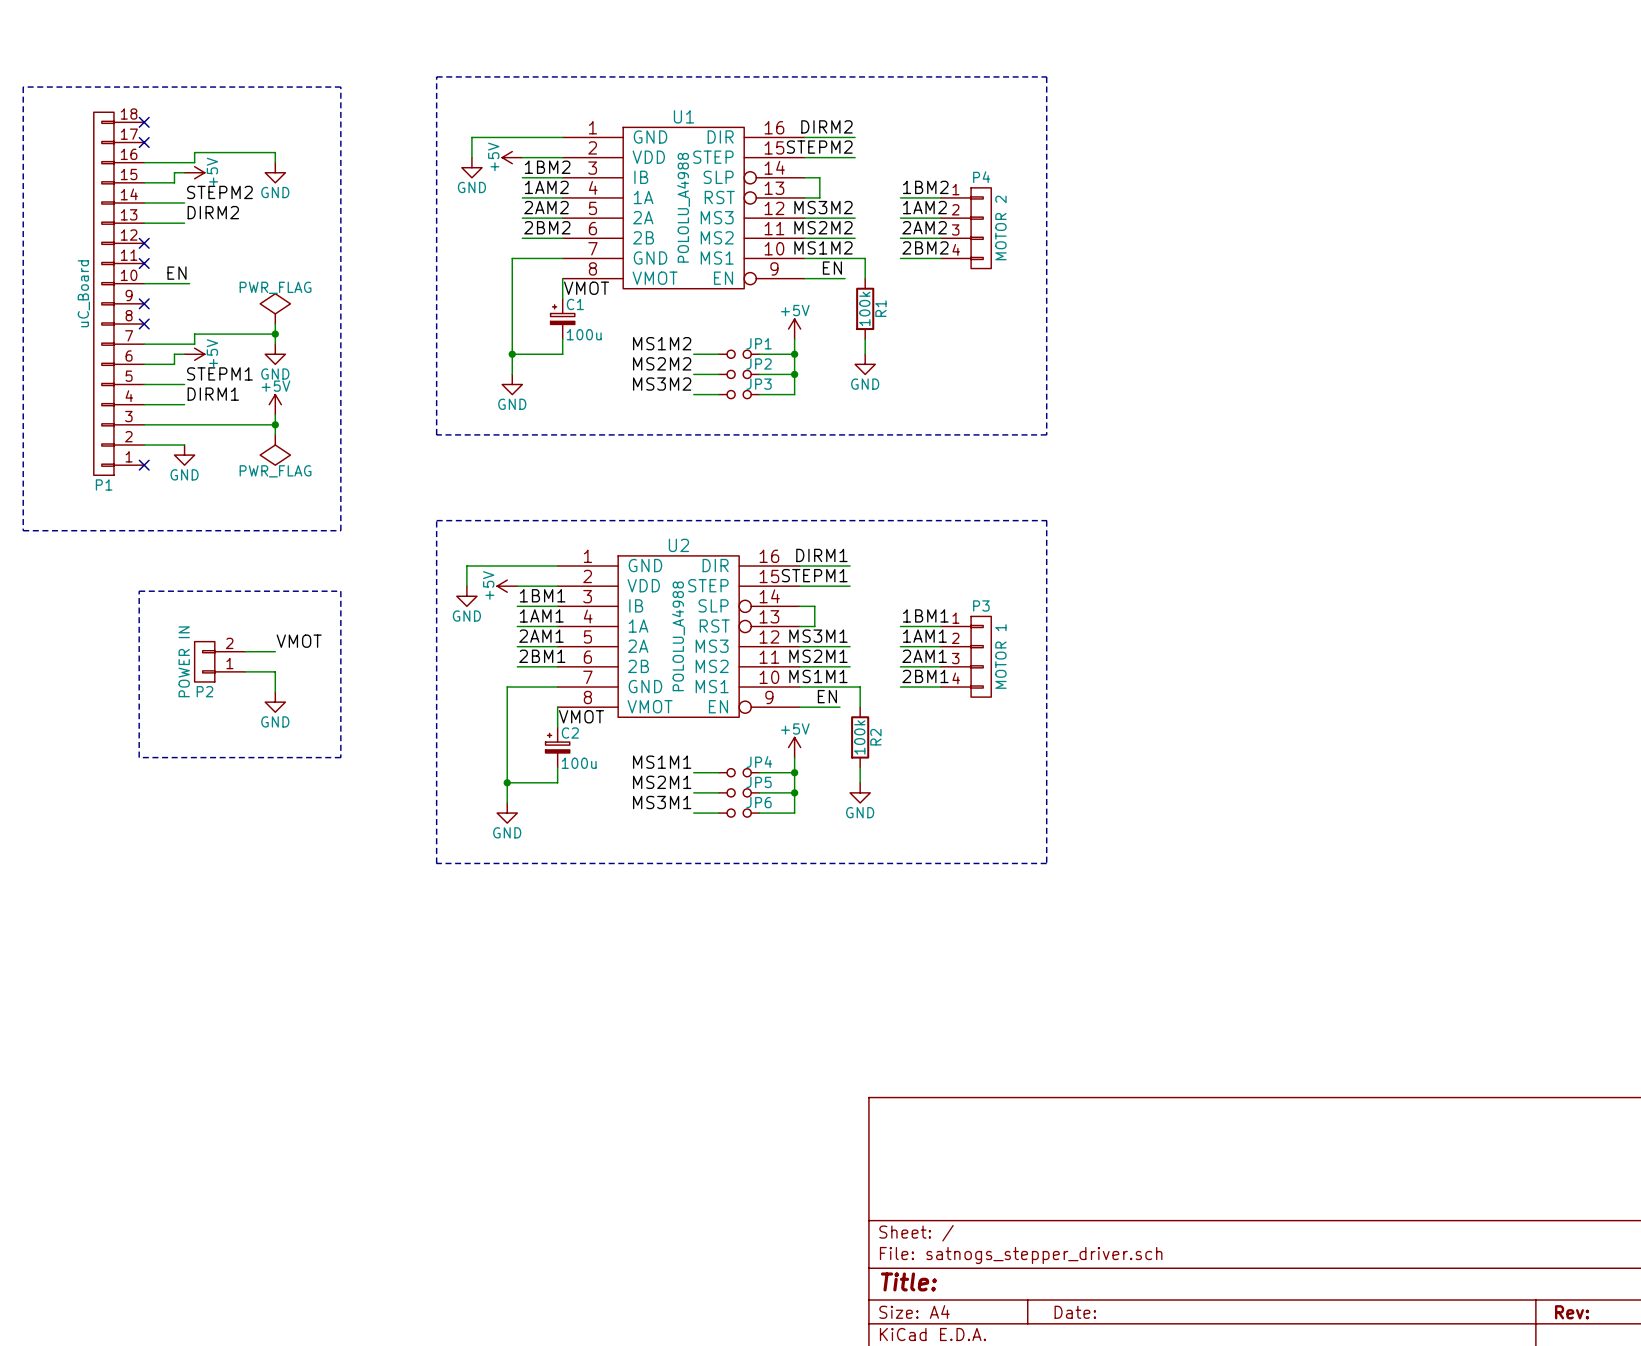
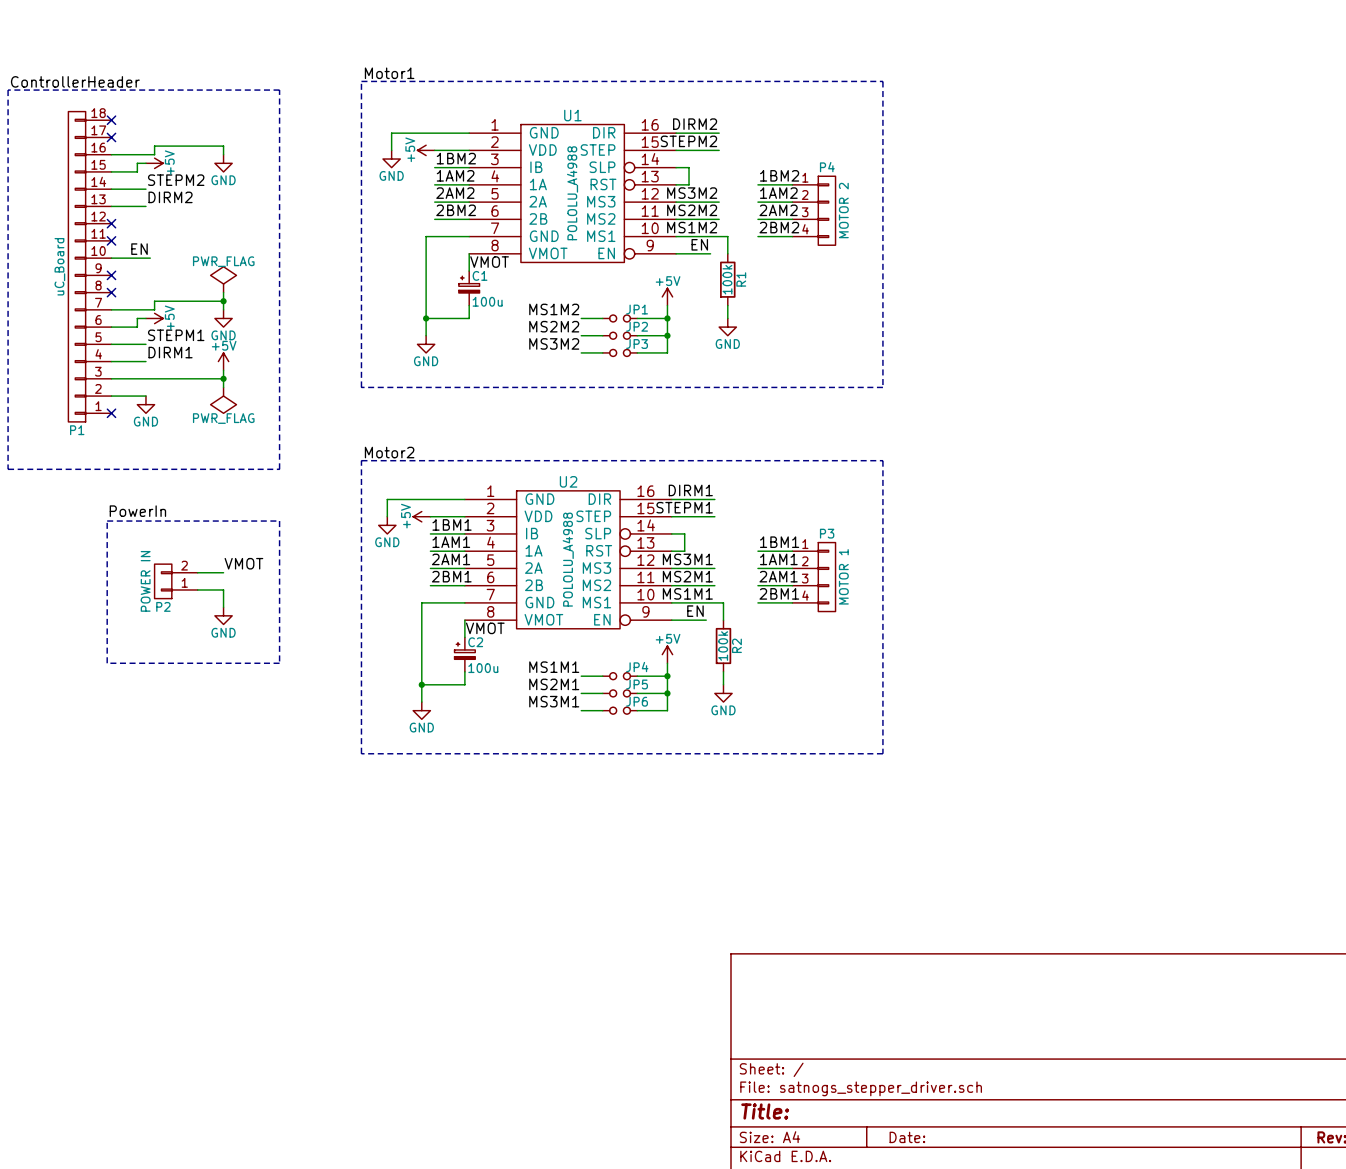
label: none -> Motor1 (389, 73)
label: none -> ControllerHeader (75, 81)
label: none -> Motor2 (389, 452)
label: none -> PowerIn (137, 511)

